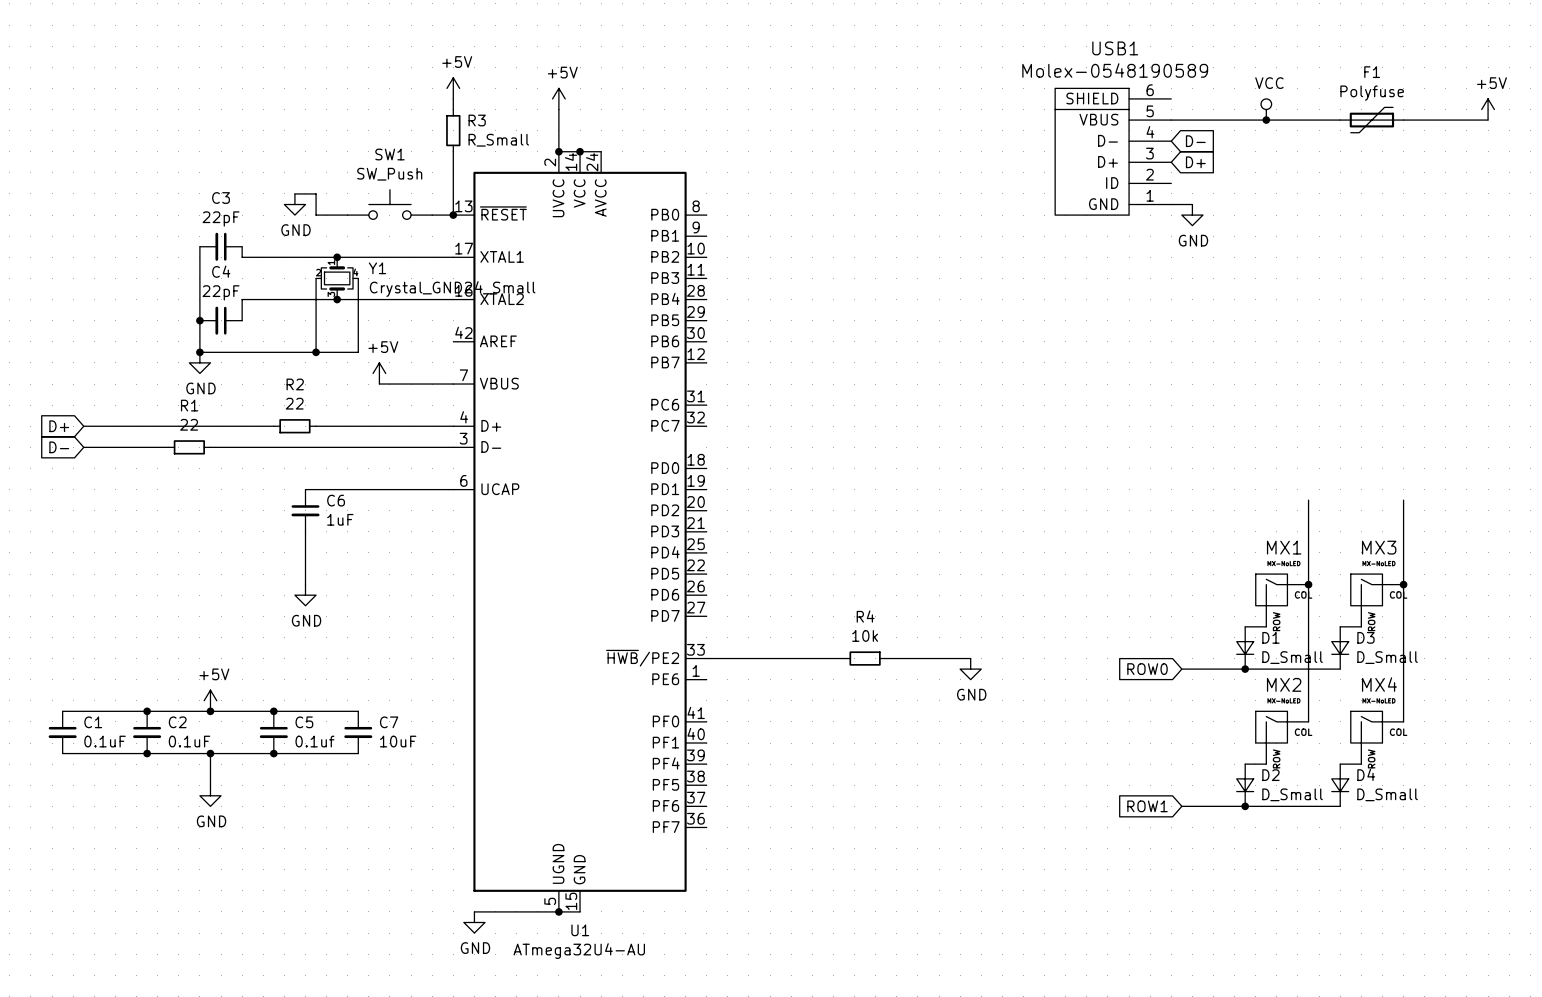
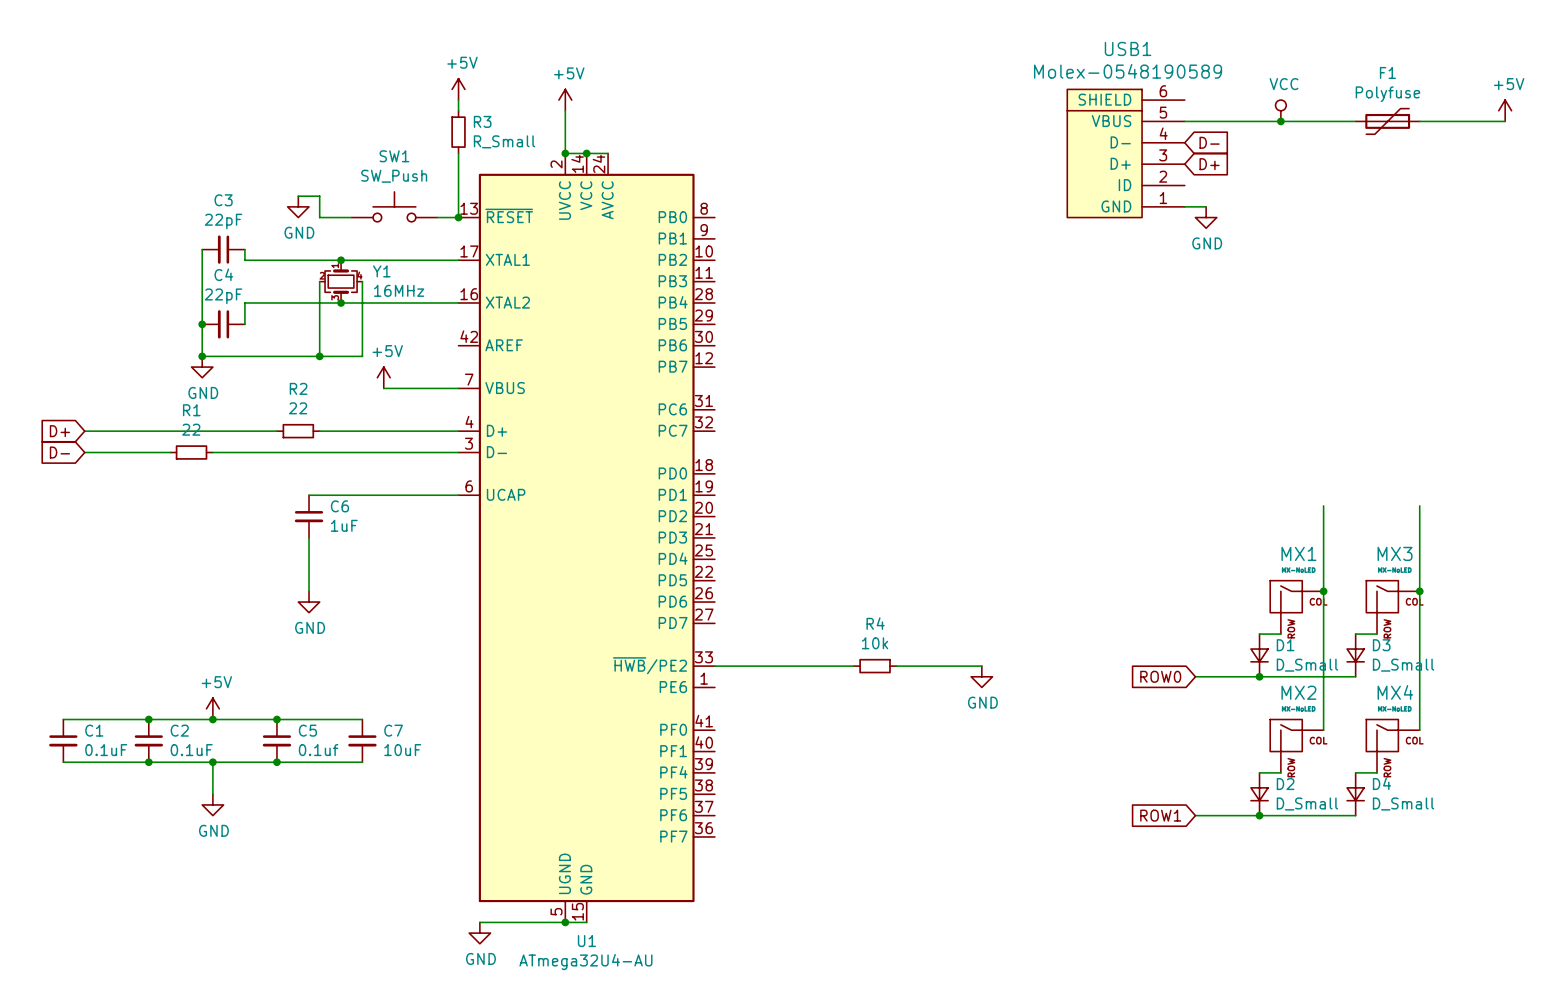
Y1 value: Crystal_GND24_Small (452, 289) -> 16MHz (399, 290)

